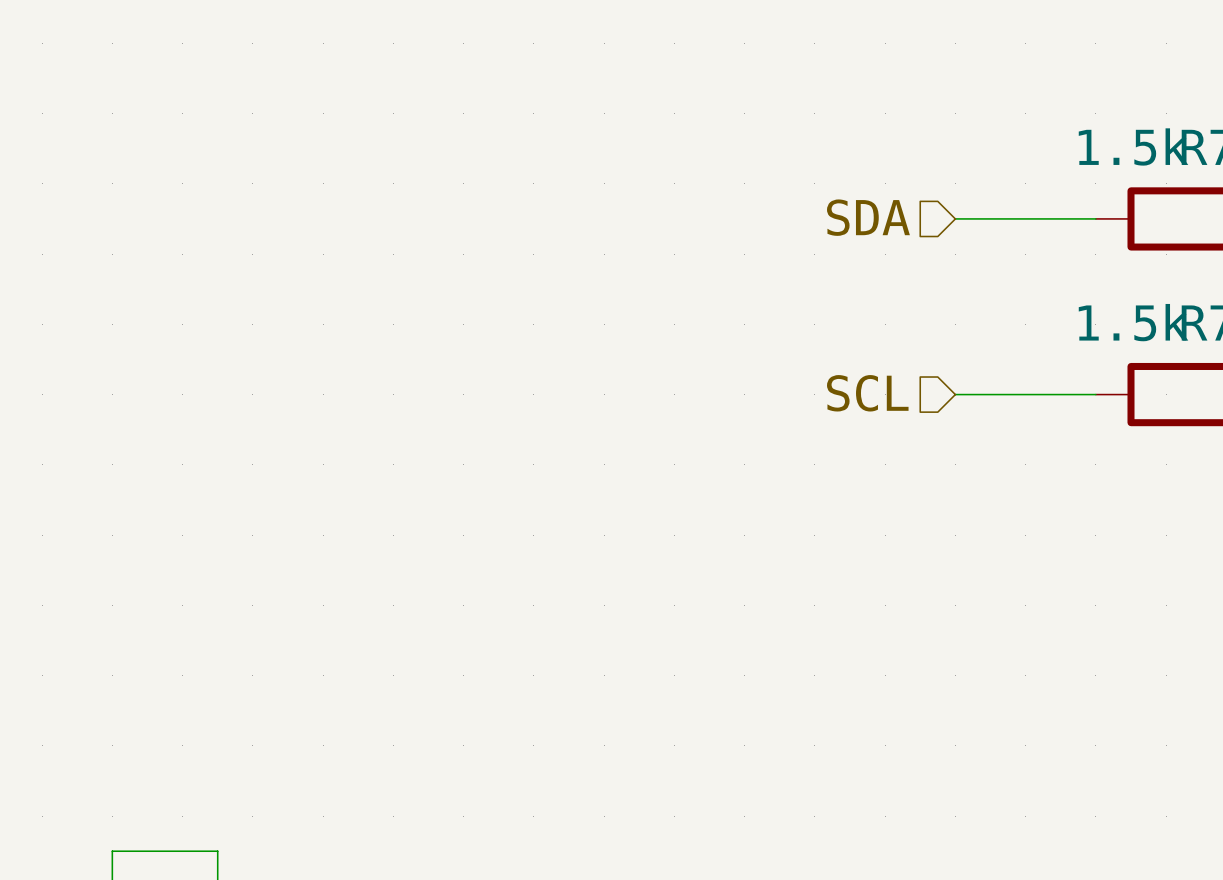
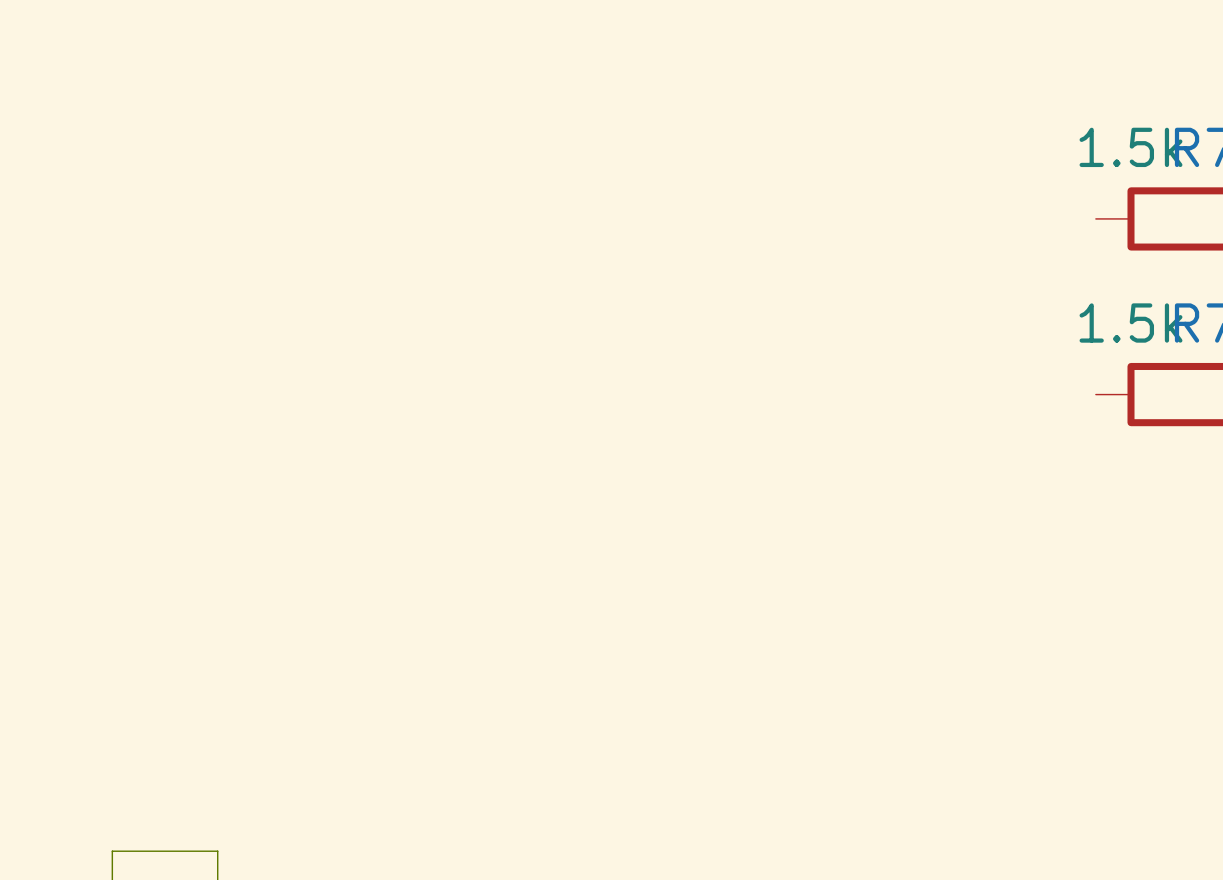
hierarchical label: SDA (868, 217) -> none
wire: (955, 218) (1095, 218) -> none
hierarchical label: SCL (867, 393) -> none
wire: (955, 394) (1095, 394) -> none

